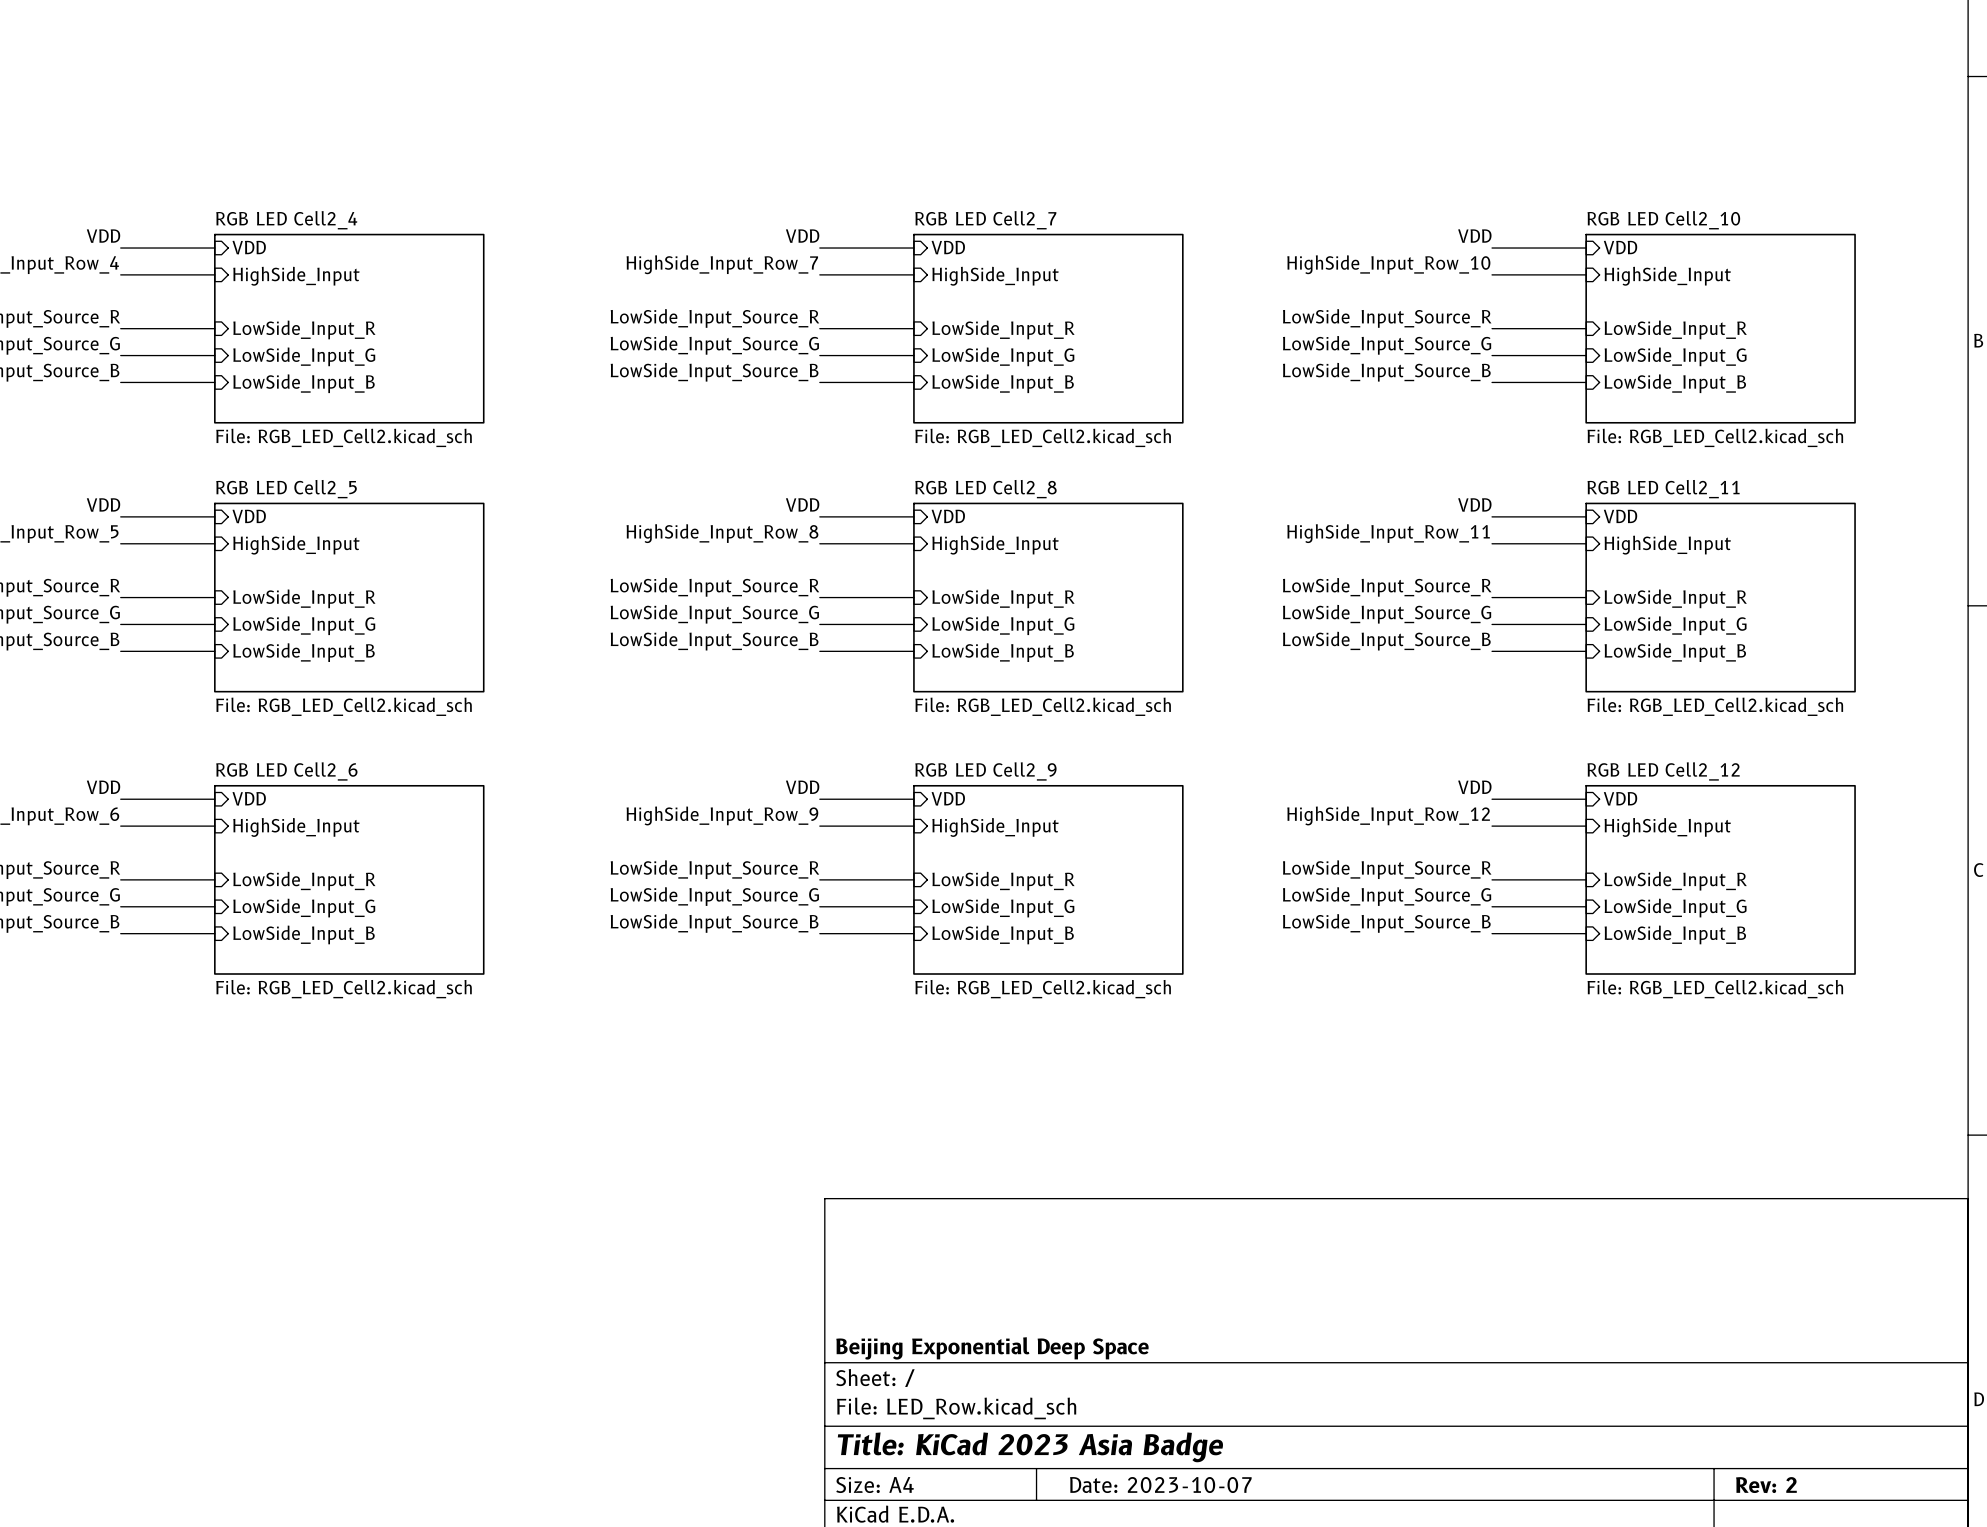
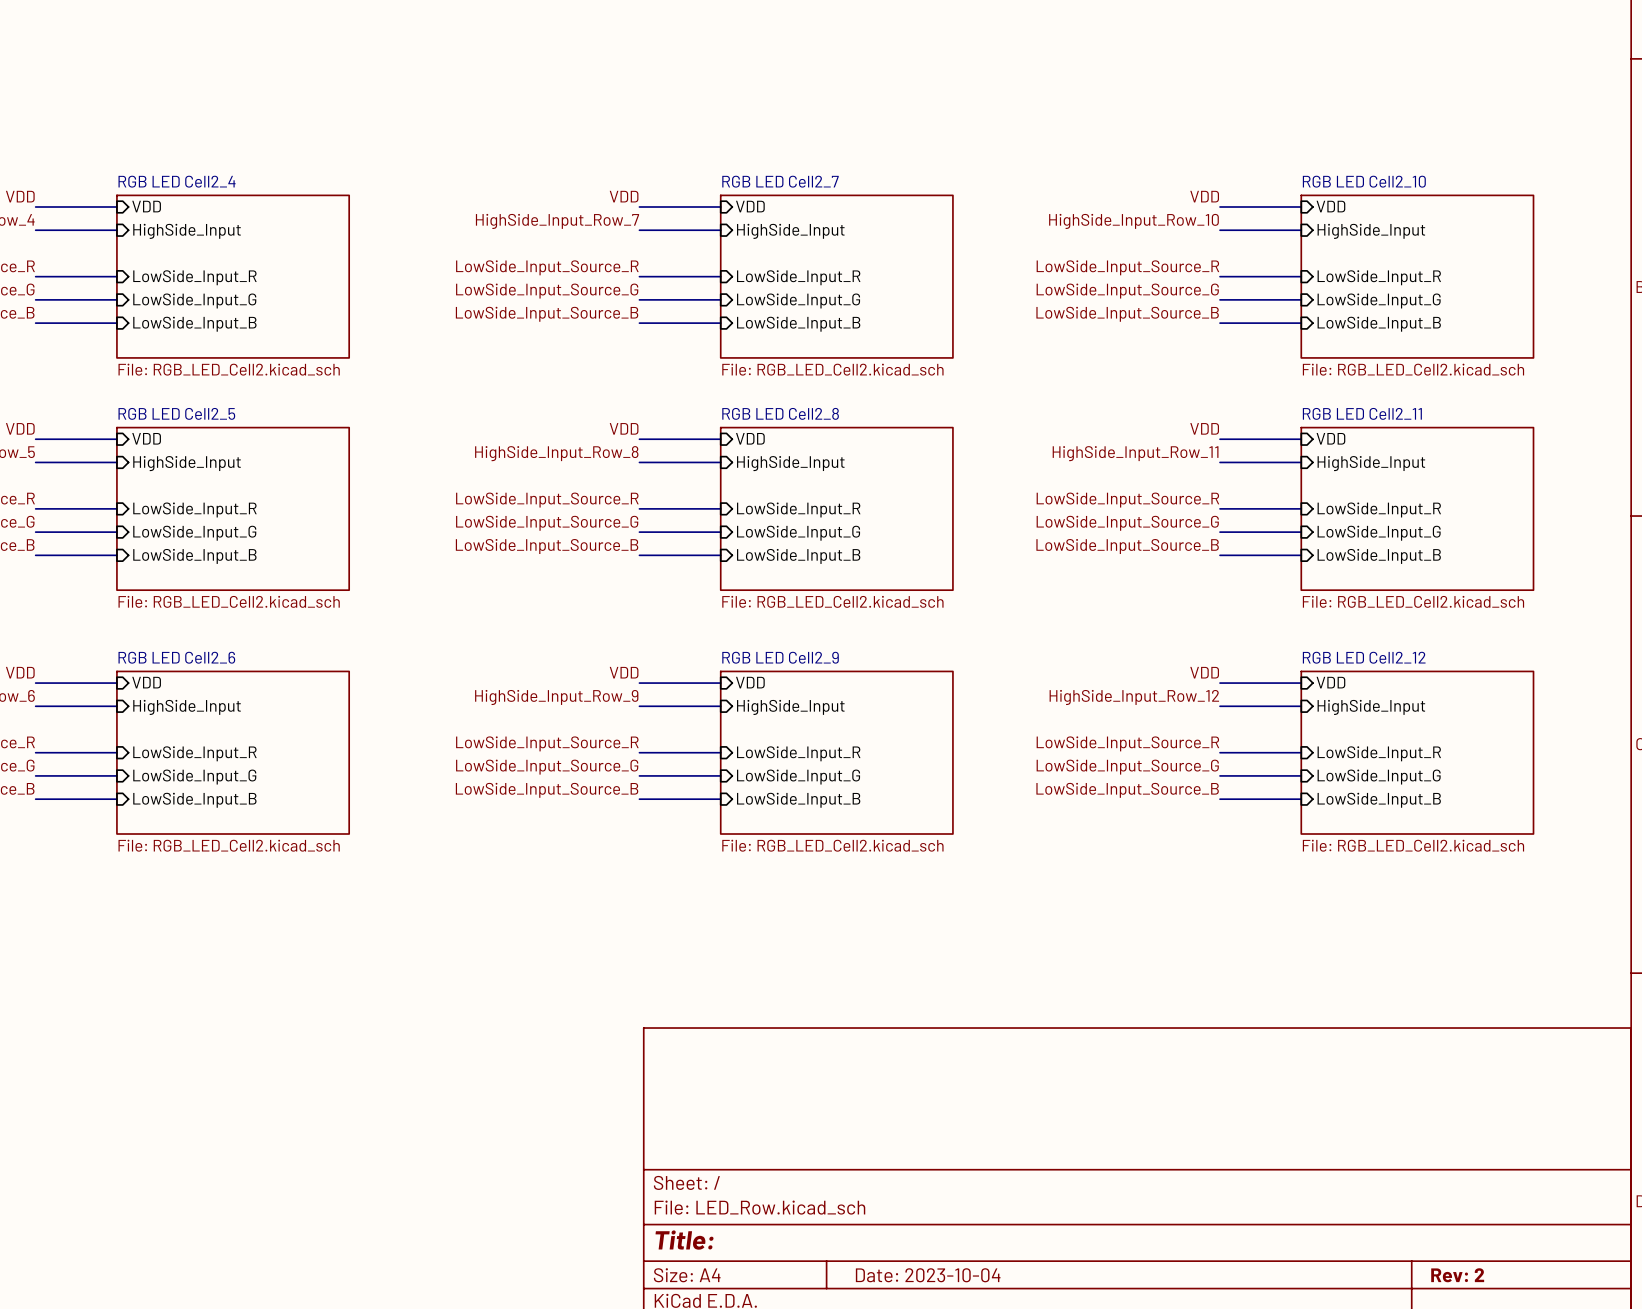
title block: Beijing Exponential Deep Space (992, 1348) -> none
title block: Title: KiCad 2023 Asia Badge (1030, 1447) -> Title: (684, 1240)
title block: Date: 2023-10-07 (1160, 1485) -> Date: 2023-10-04 (928, 1275)

